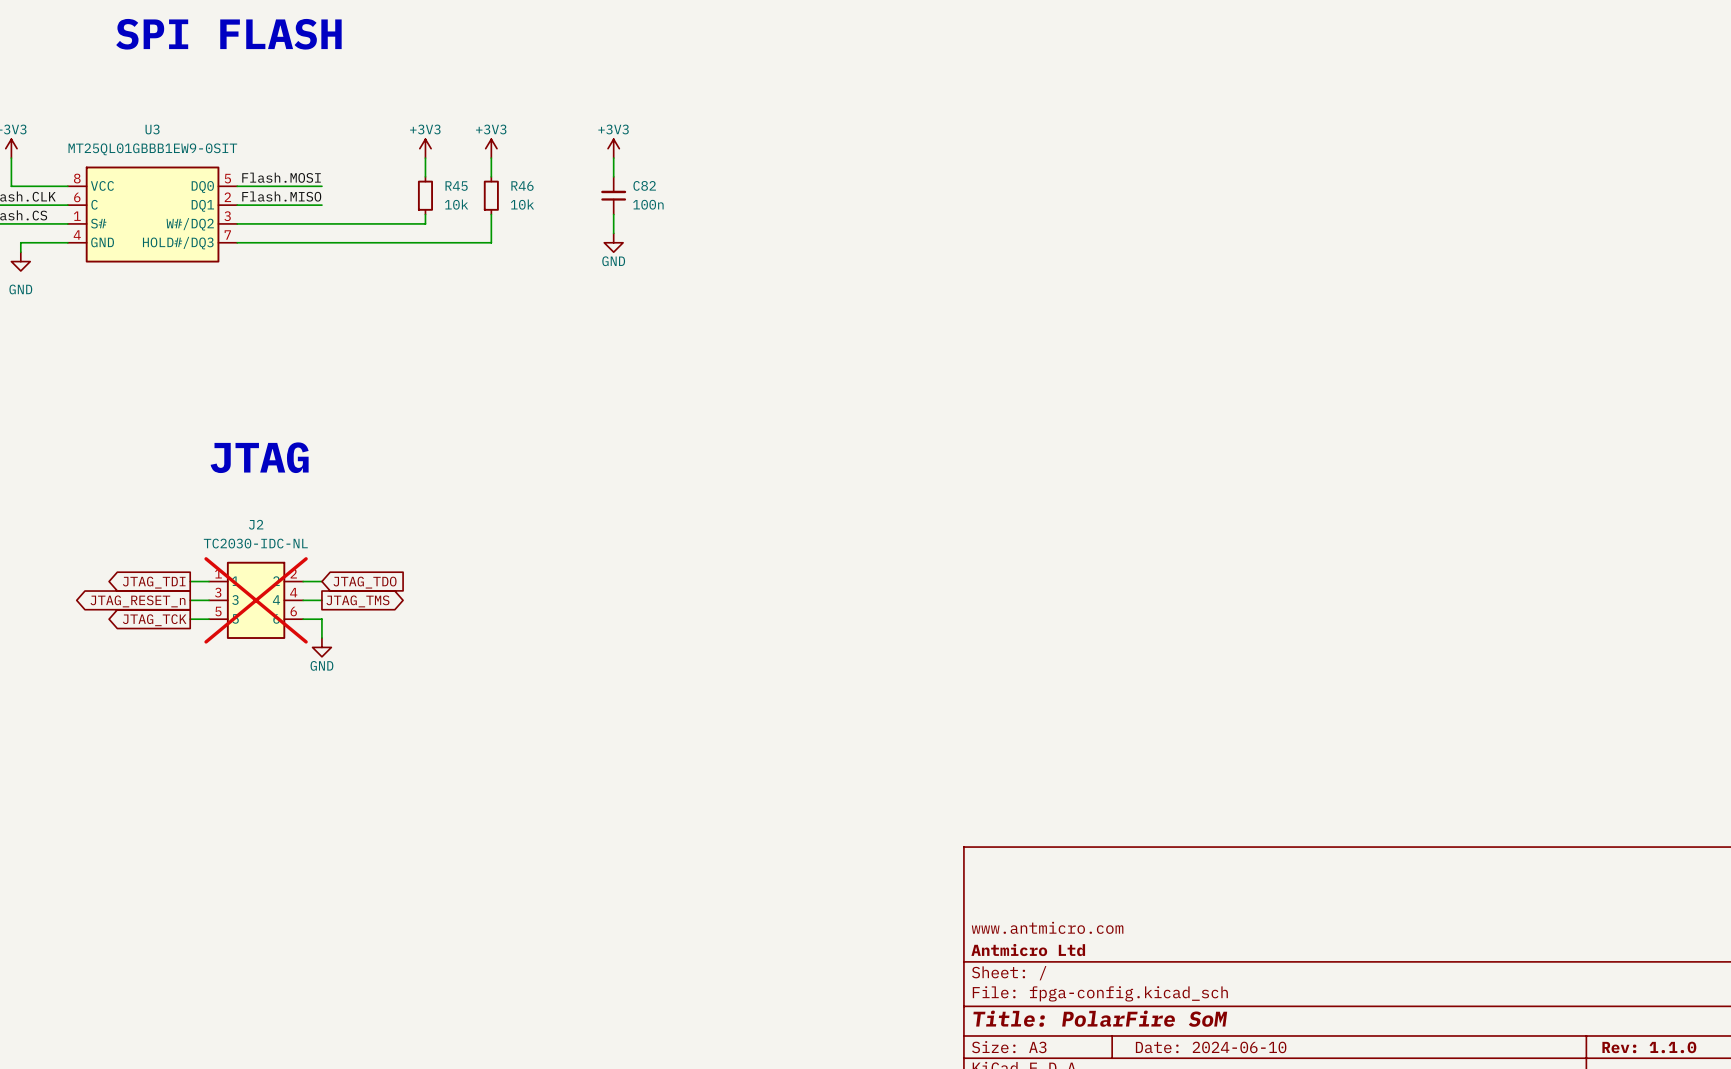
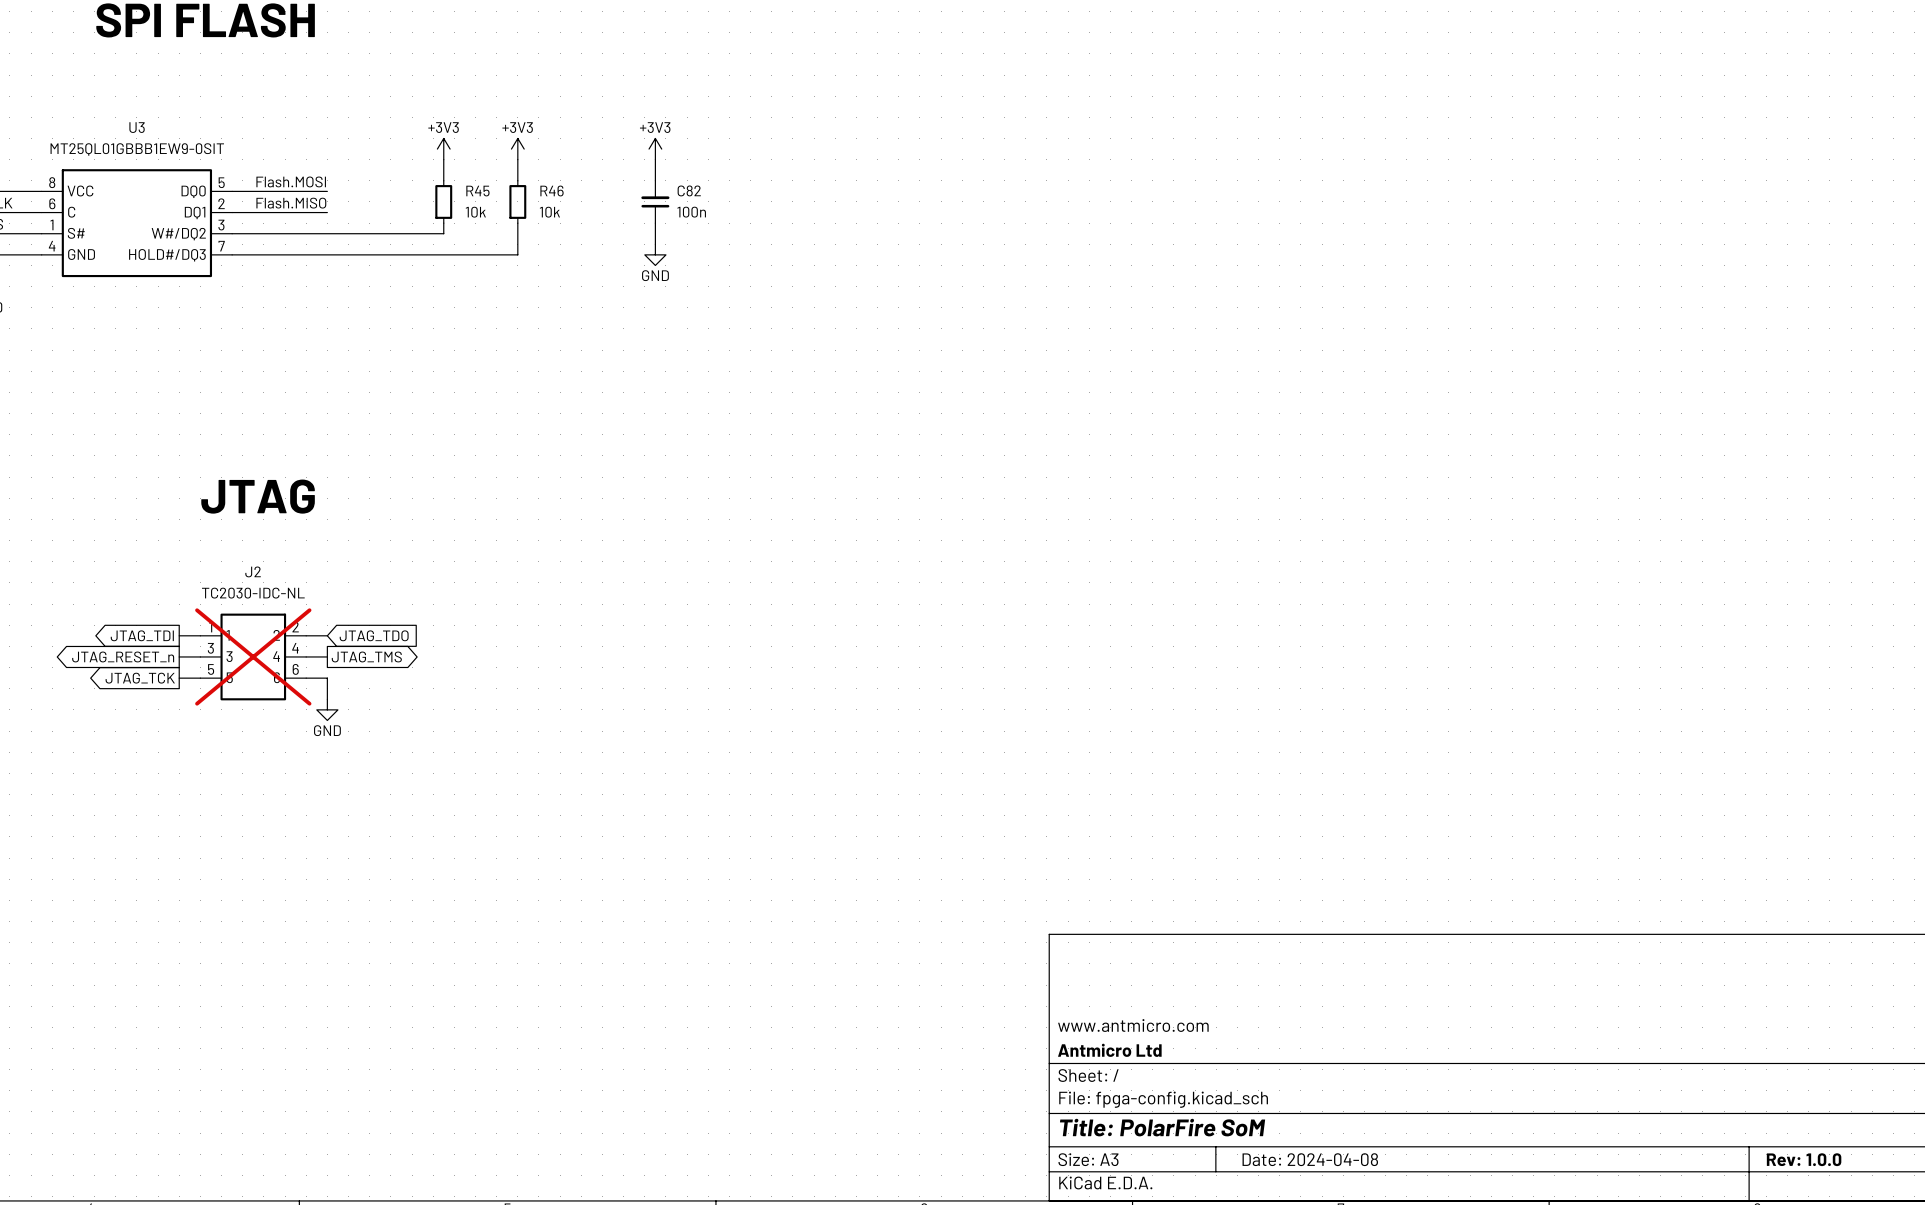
title block: Date: 2024-06-10 (1211, 1047) -> Date: 2024-04-08 (1310, 1159)
title block: Rev: 1.1.0 (1649, 1047) -> Rev: 1.0.0 (1804, 1159)

